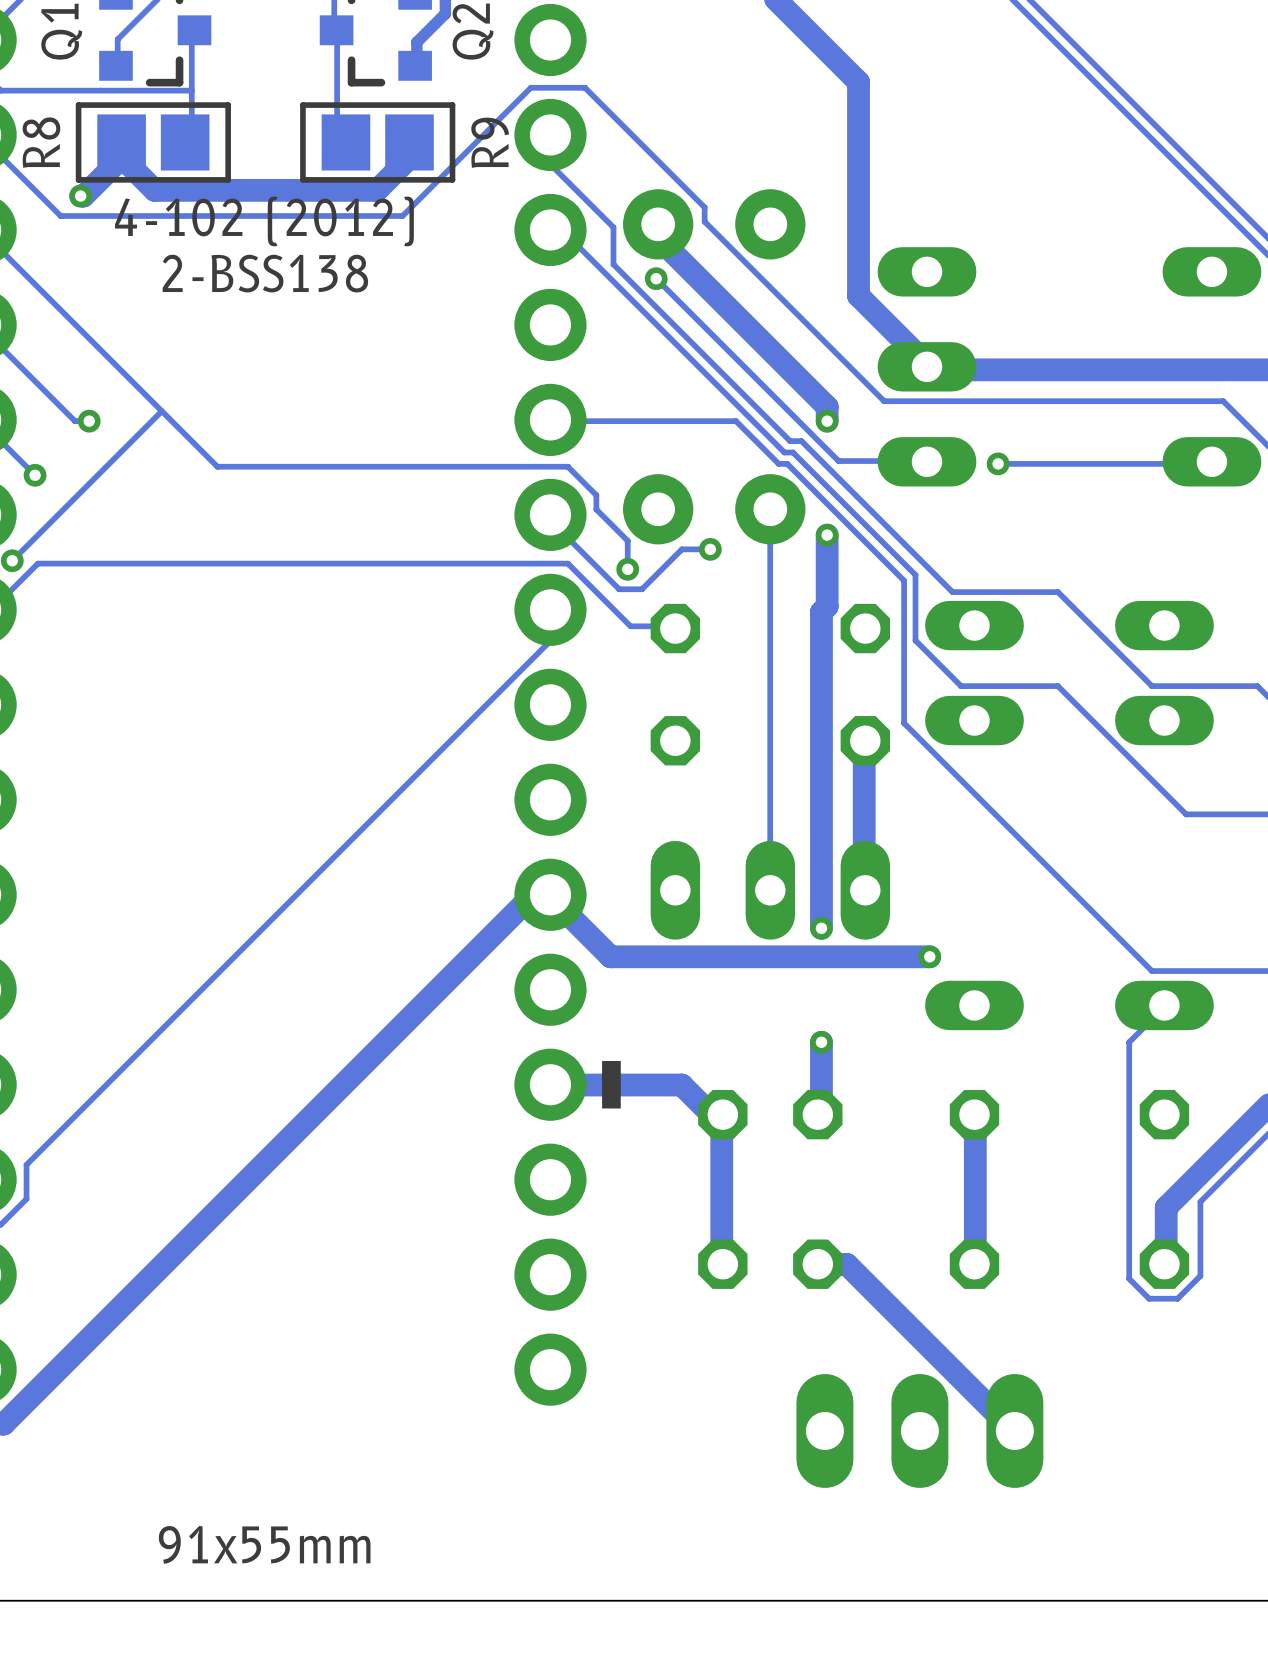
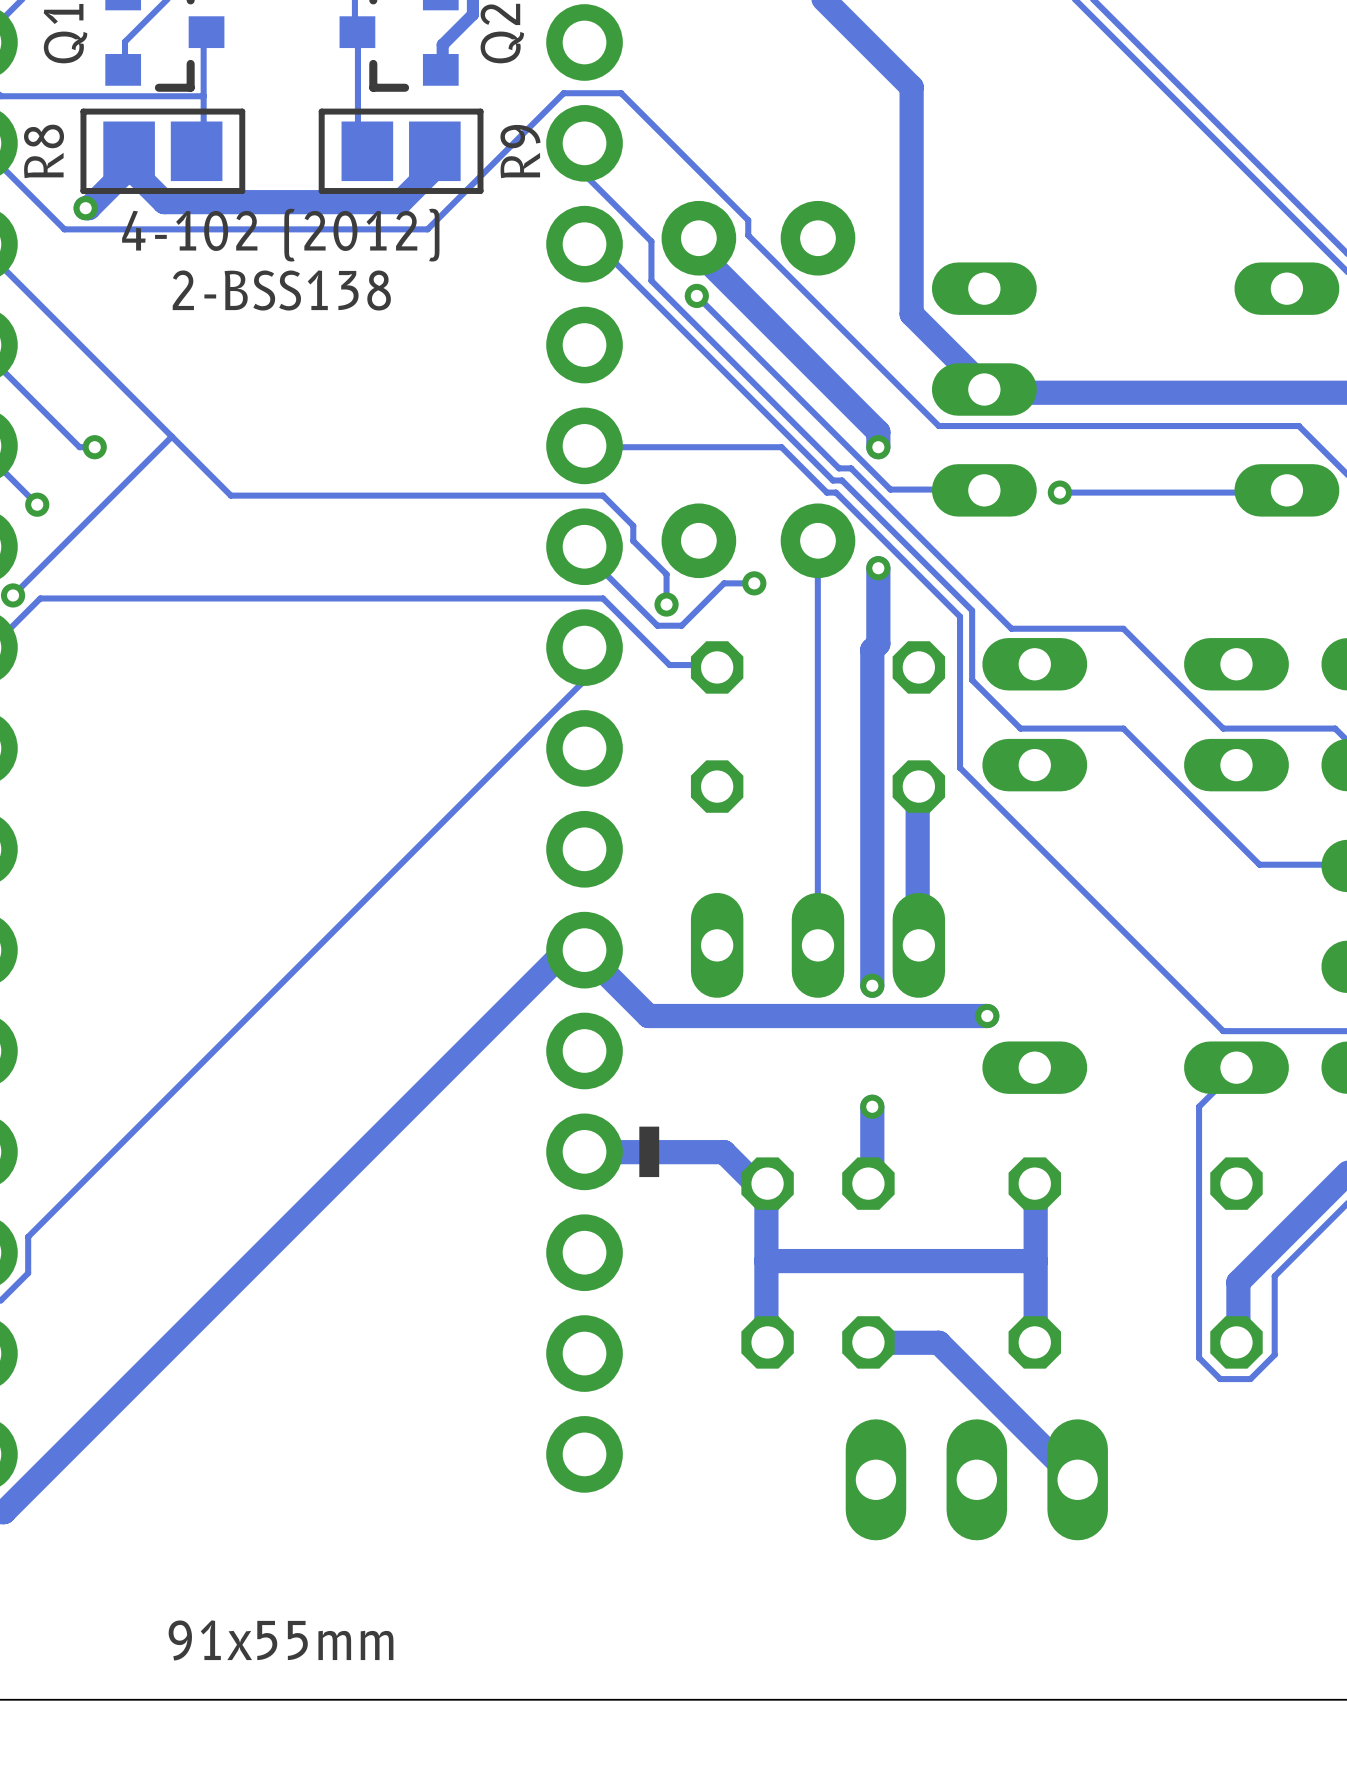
track: none -> (1035, 1261) (766, 1261)
track: (847, 1264) (1014, 1430) -> (899, 1342) (938, 1342) (1077, 1479)
part position: (919, 1430) -> (976, 1479)

